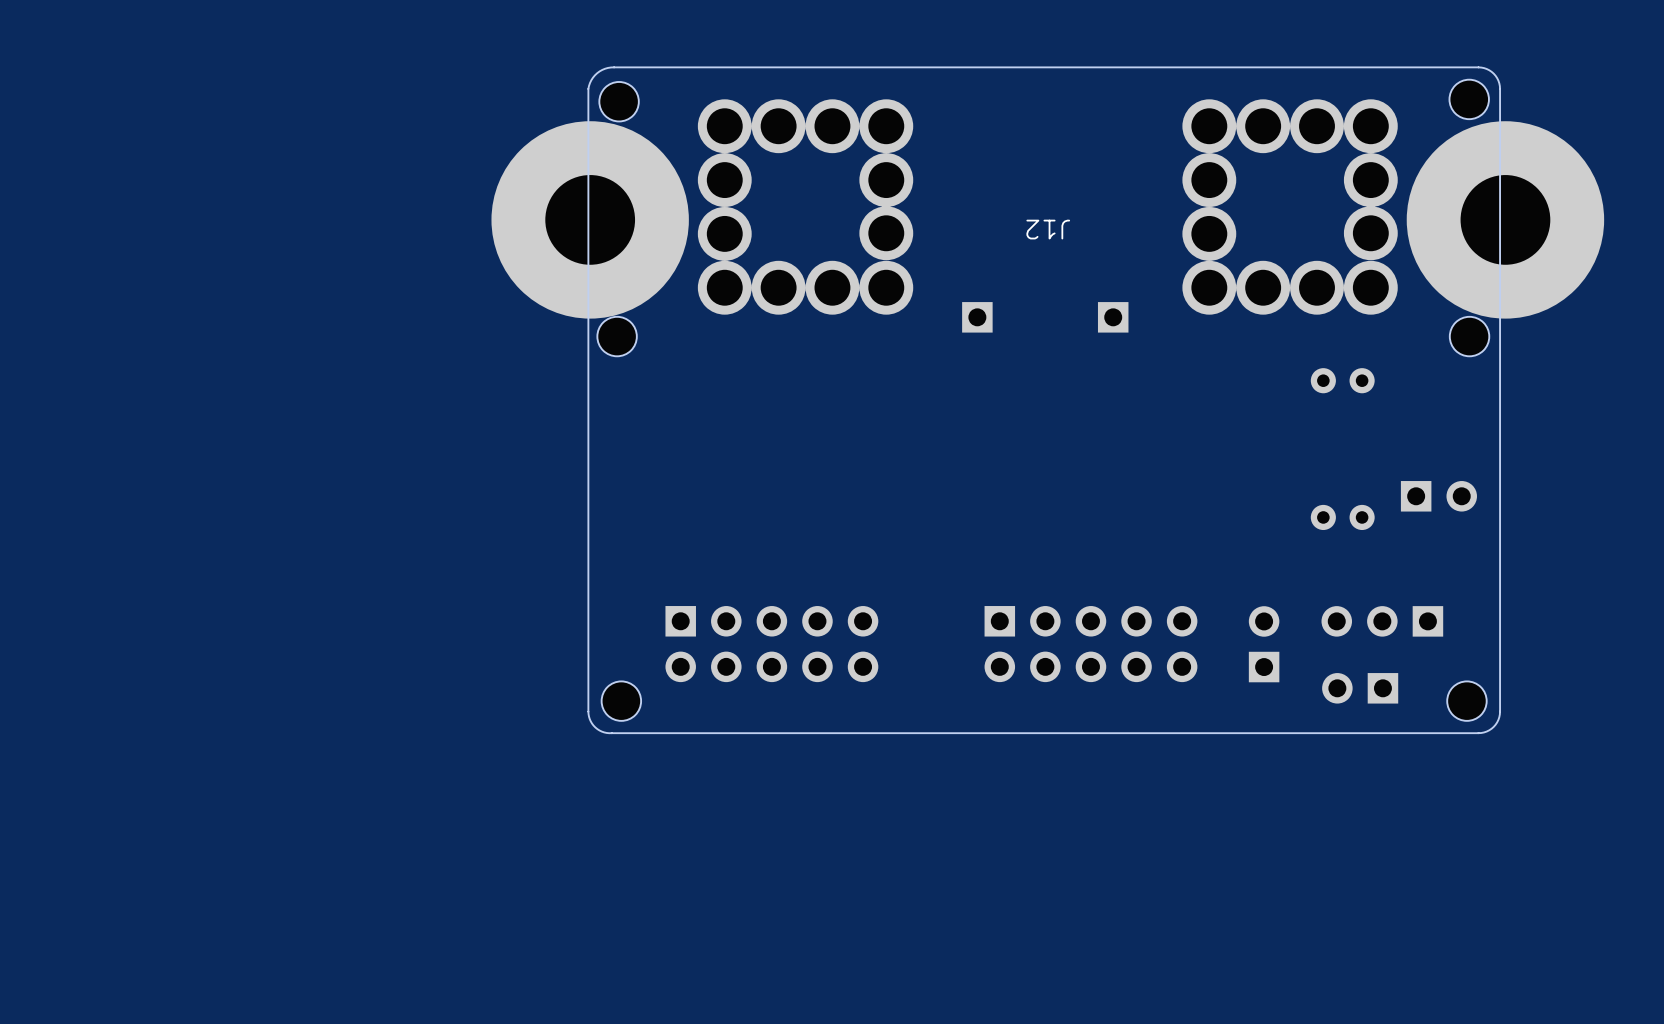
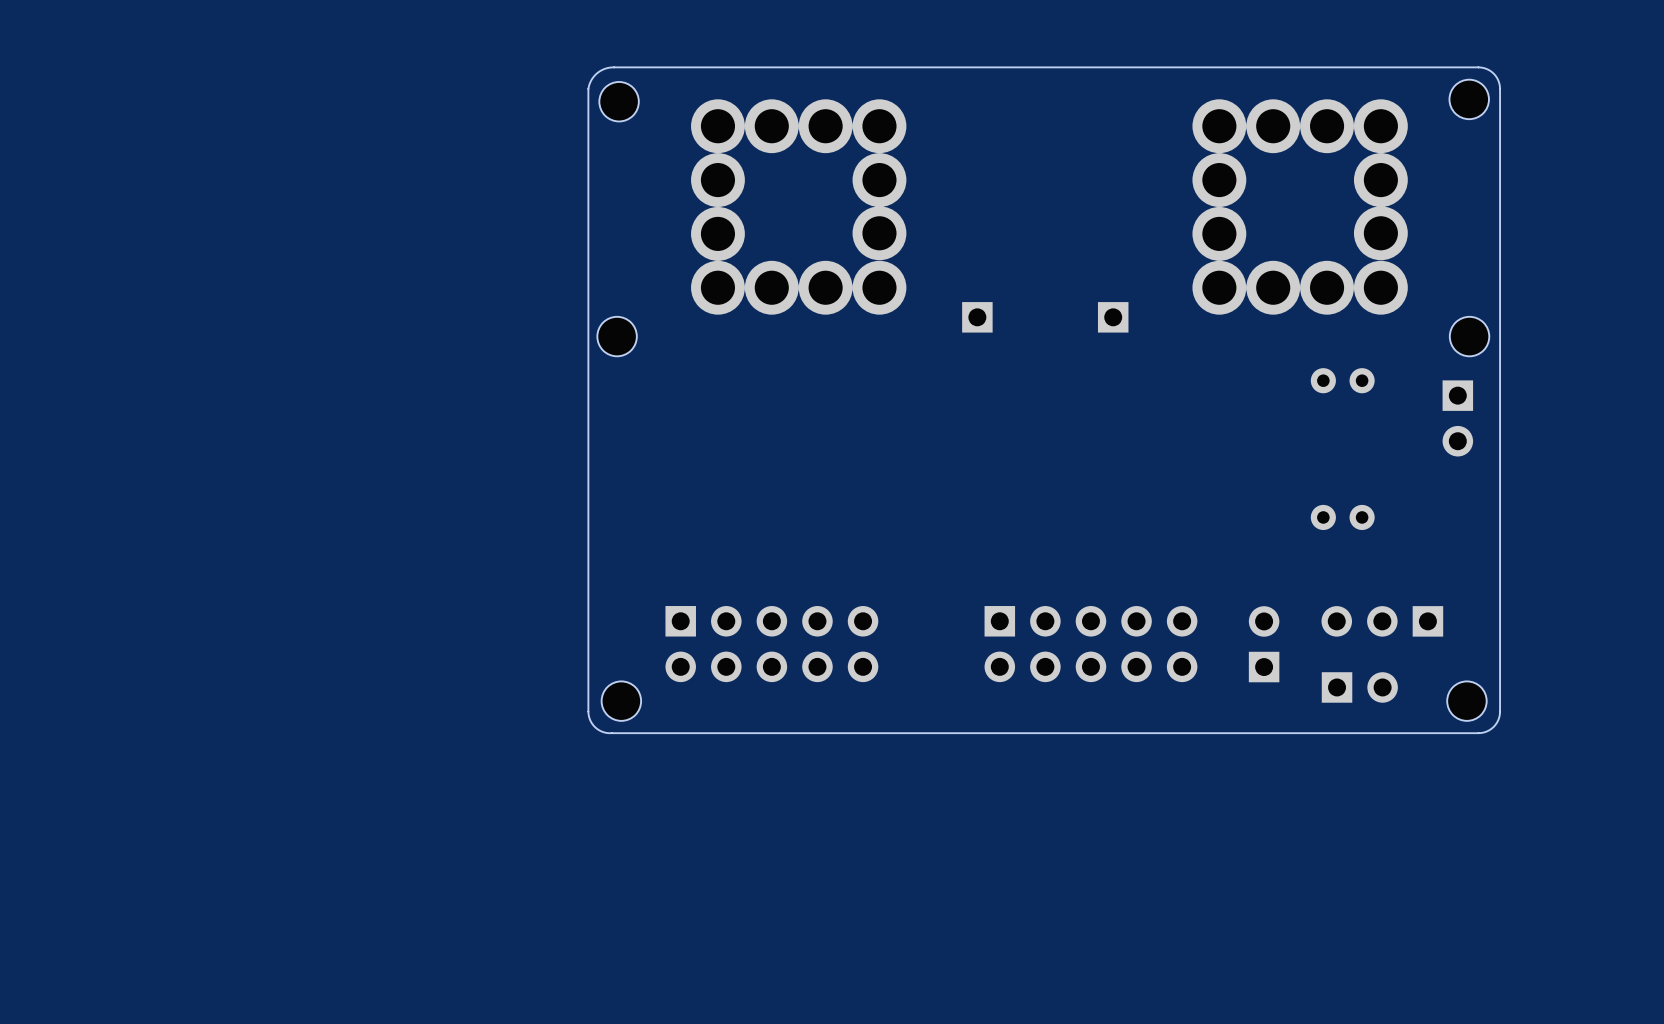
part footprint: [697, 99, 914, 315] -> [691, 99, 907, 315]
part footprint: [1182, 99, 1398, 315] -> [1192, 99, 1408, 315]
J12: (1047, 219) -> none
part rotation: 0° (1438, 496) -> 90° clockwise (1457, 418)
part position: (1438, 496) -> (1457, 418)
part rotation: 0° (1360, 688) -> 180° (1359, 687)

